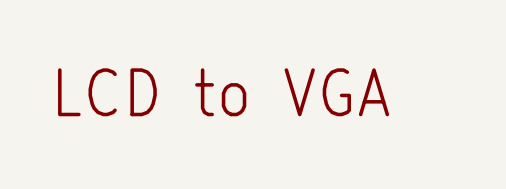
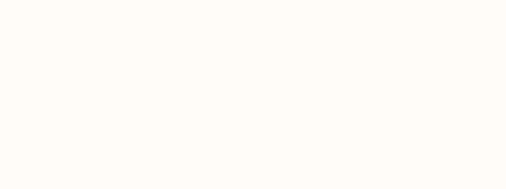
text: LCD to VGA (223, 92) -> none

